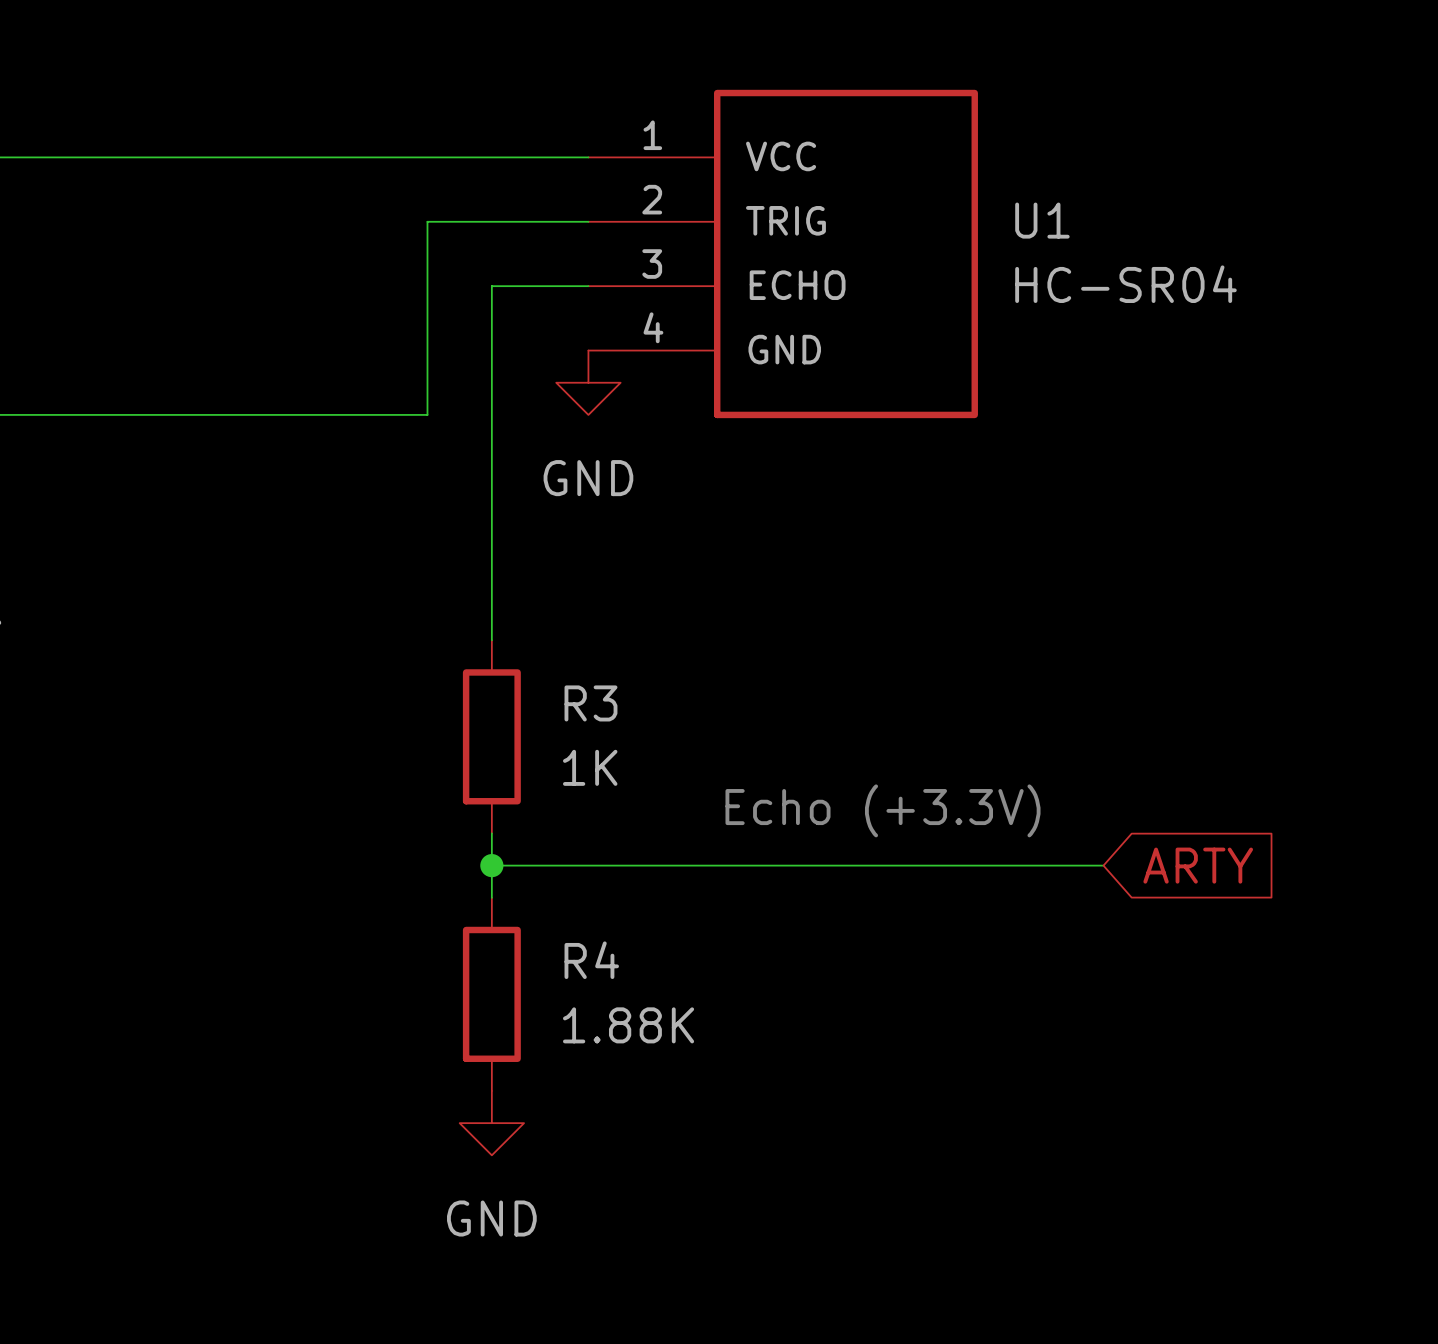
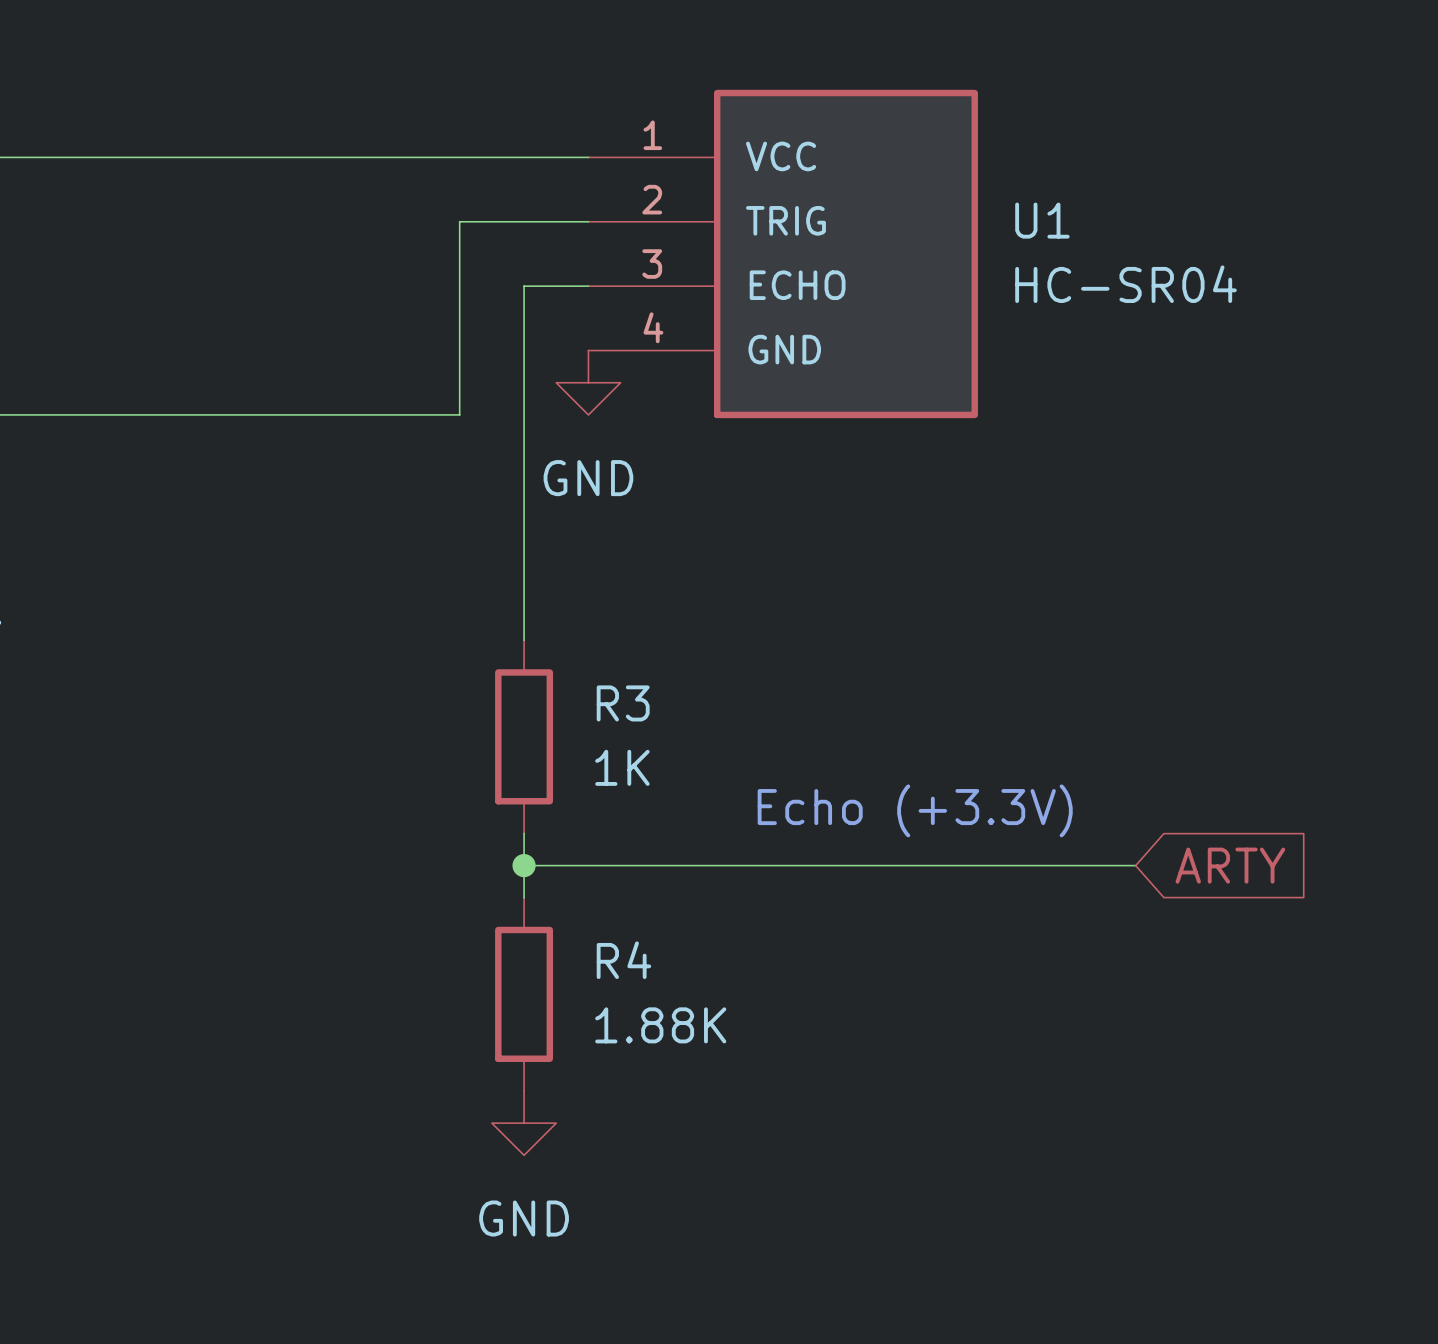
wire: (459, 221) (427, 221) (427, 414) -> (459, 221) (459, 414) (427, 414)
wire: (524, 286) (491, 286) (491, 640) -> (524, 286) (524, 640)
R3 position: (491, 736) -> (524, 736)
text position: Echo (+3.3V) (883, 810) -> Echo (+3.3V) (915, 810)
wire: (491, 833) (491, 897) -> (524, 833) (524, 897)
wire: (491, 865) (524, 865) -> (1103, 865) (1135, 865)
junction position: (491, 865) -> (524, 865)
global label position: ARTY (1198, 865) -> ARTY (1230, 865)
R4 position: (491, 994) -> (524, 994)
power symbol position: GND (491, 1123) -> GND (524, 1123)

